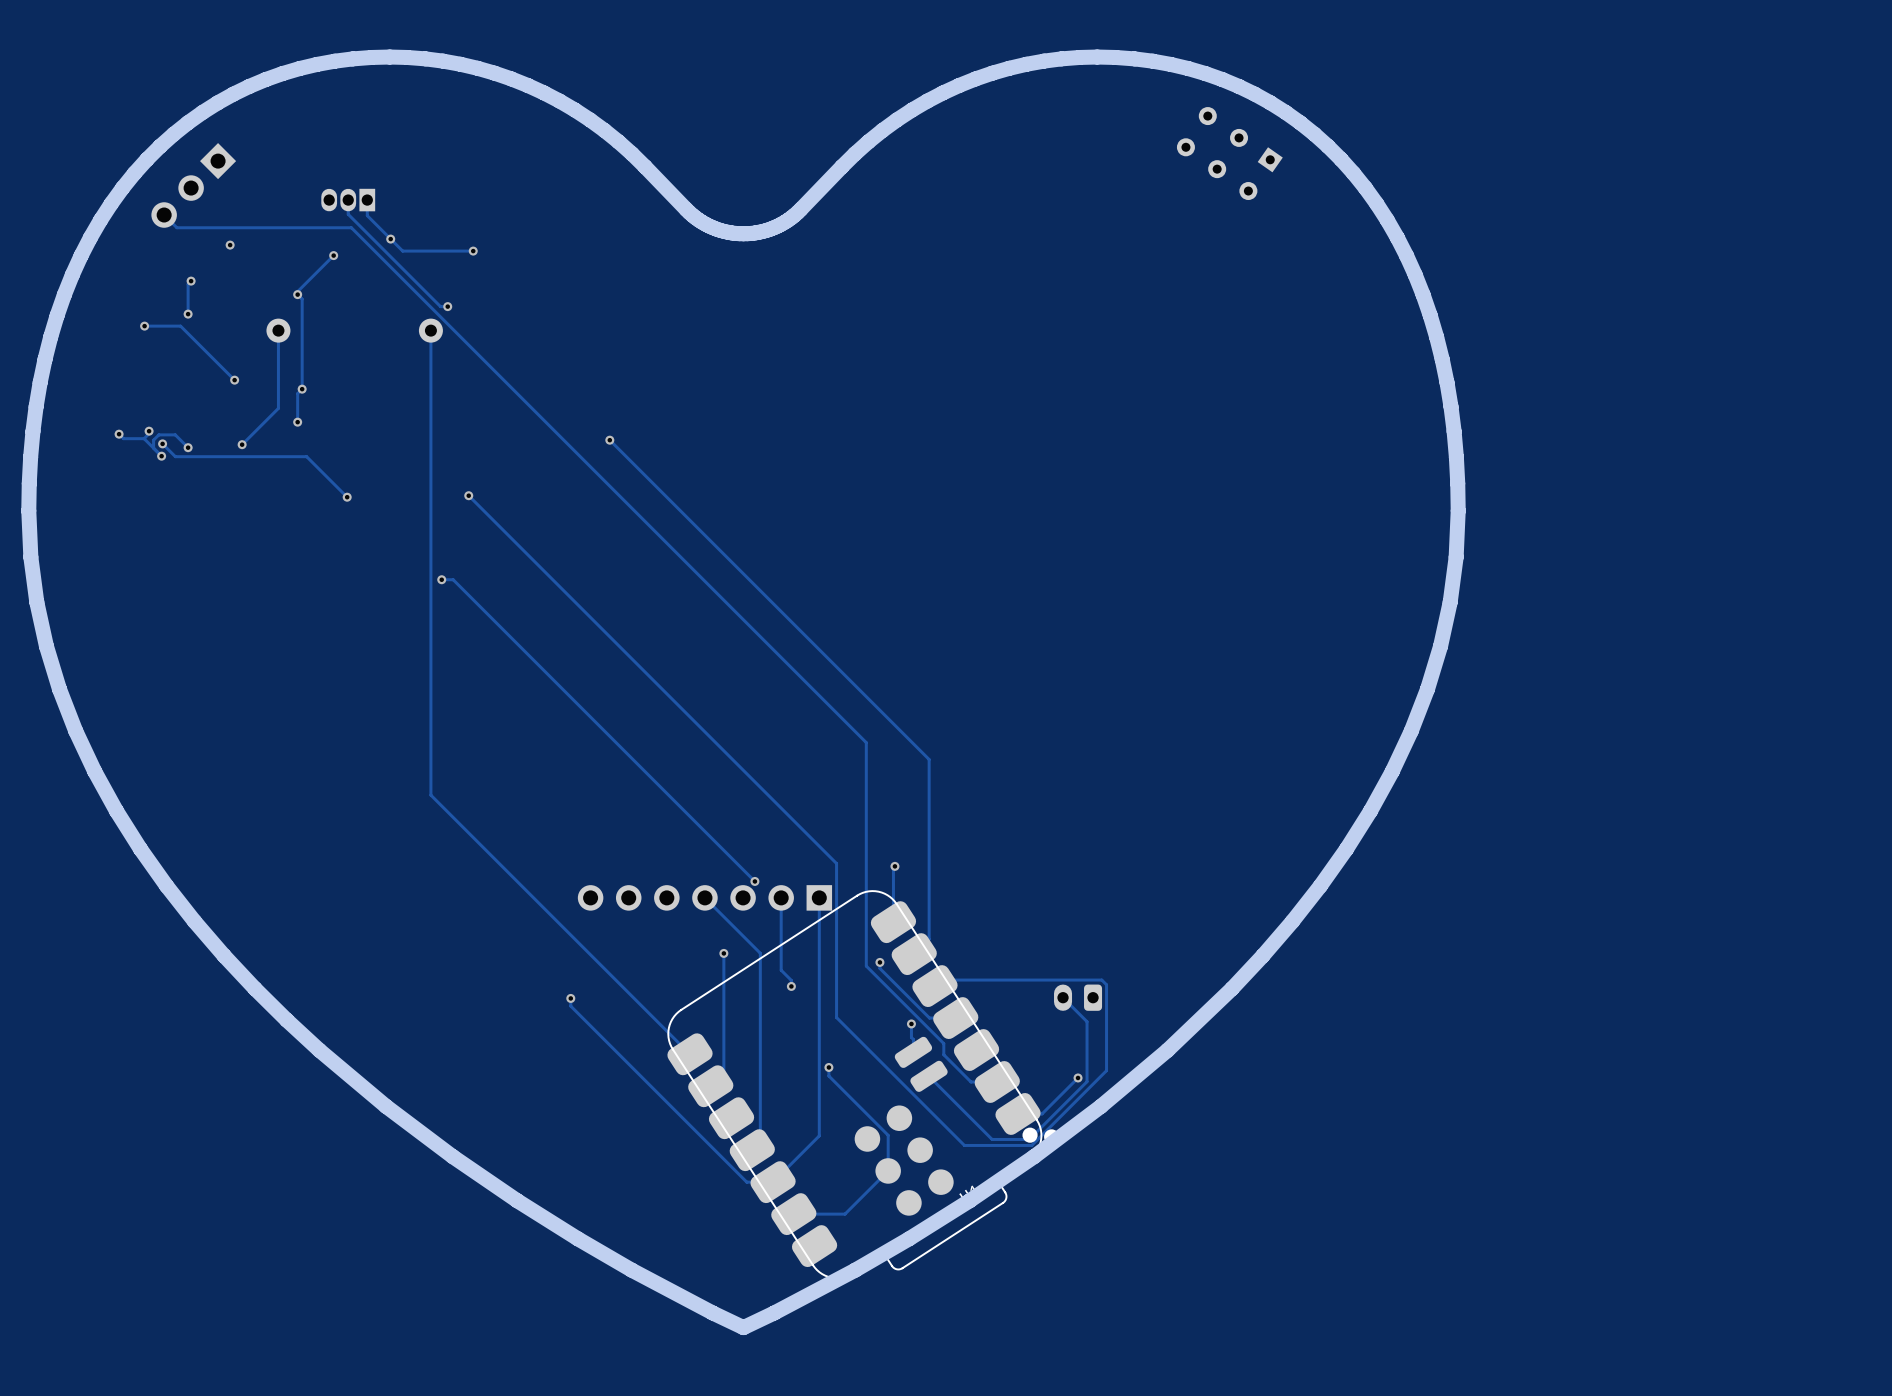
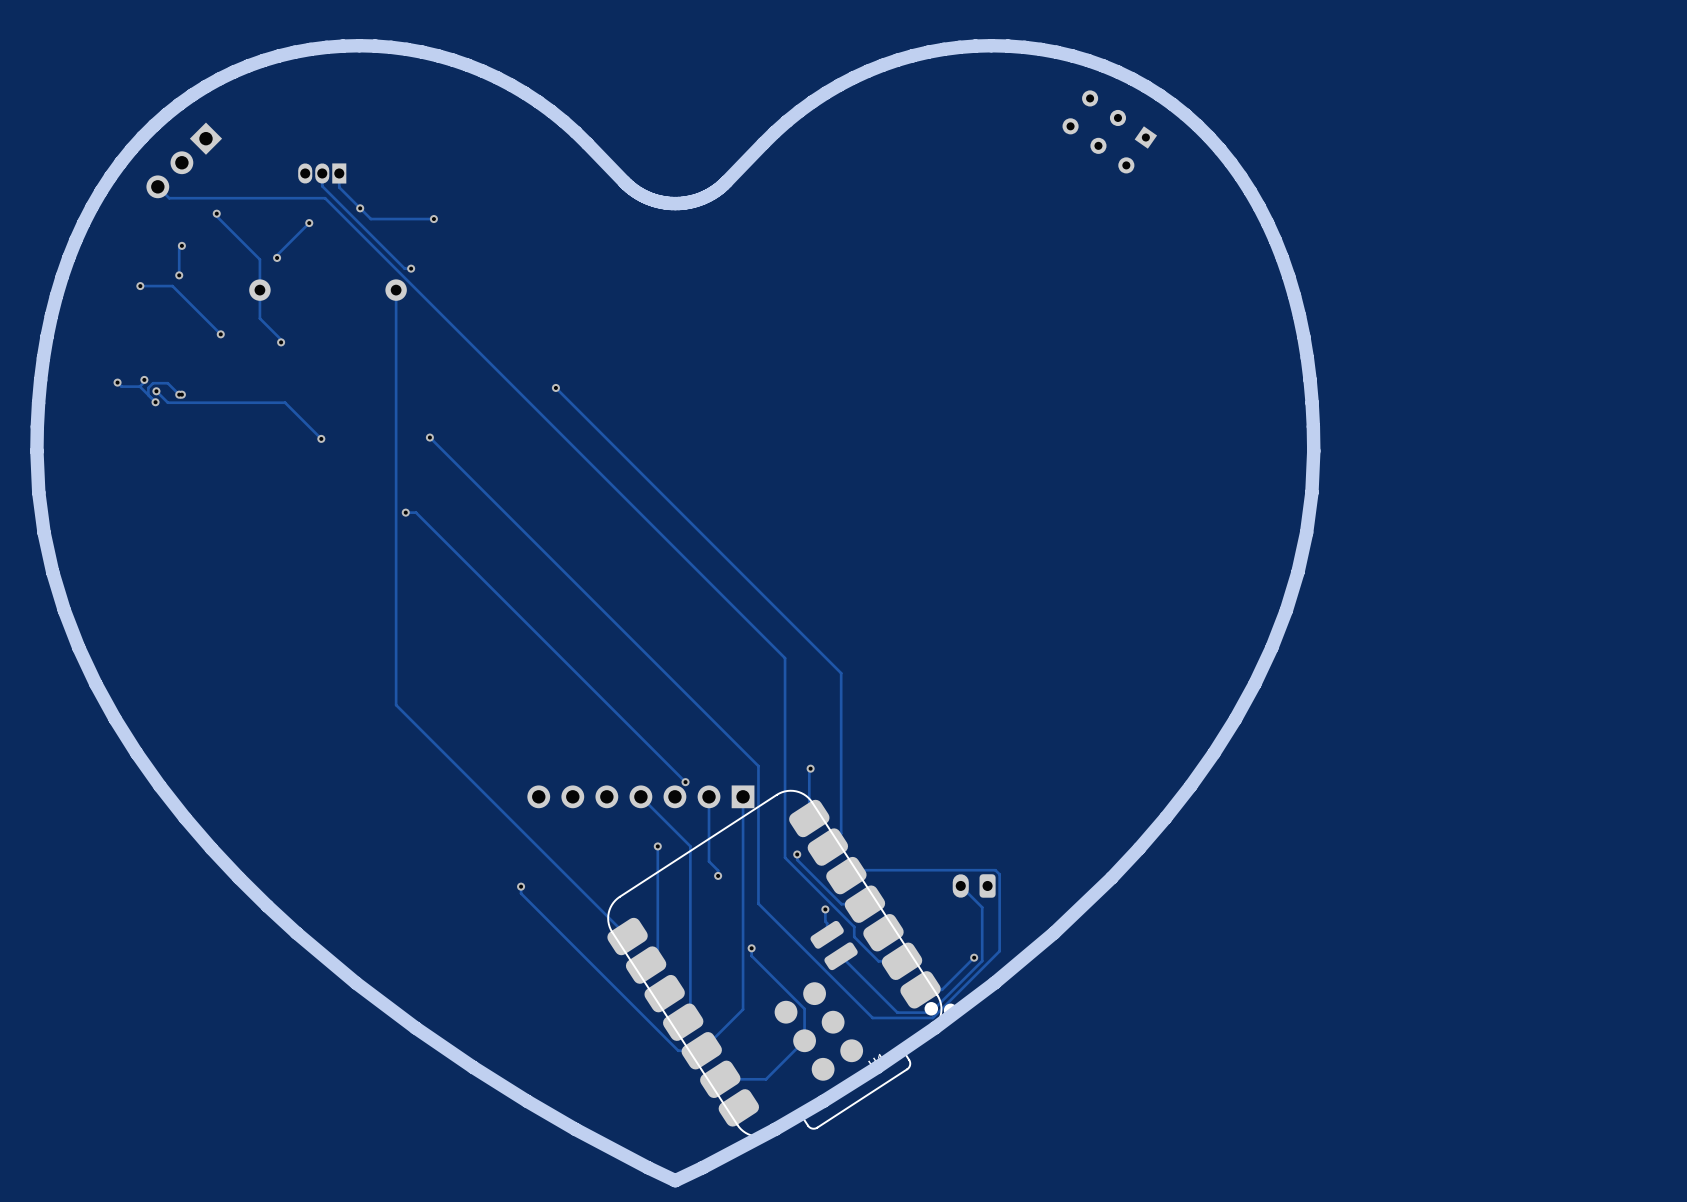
track: none -> (216, 216) (259, 259) (259, 290)
track: (297, 294) (302, 299) (302, 386) -> (259, 318) (281, 339)
track: (278, 362) (278, 408) (242, 444) -> none
track: (302, 389) (297, 393) (297, 422) -> none
via: (297, 422) -> none
via position: (242, 444) -> (181, 394)

